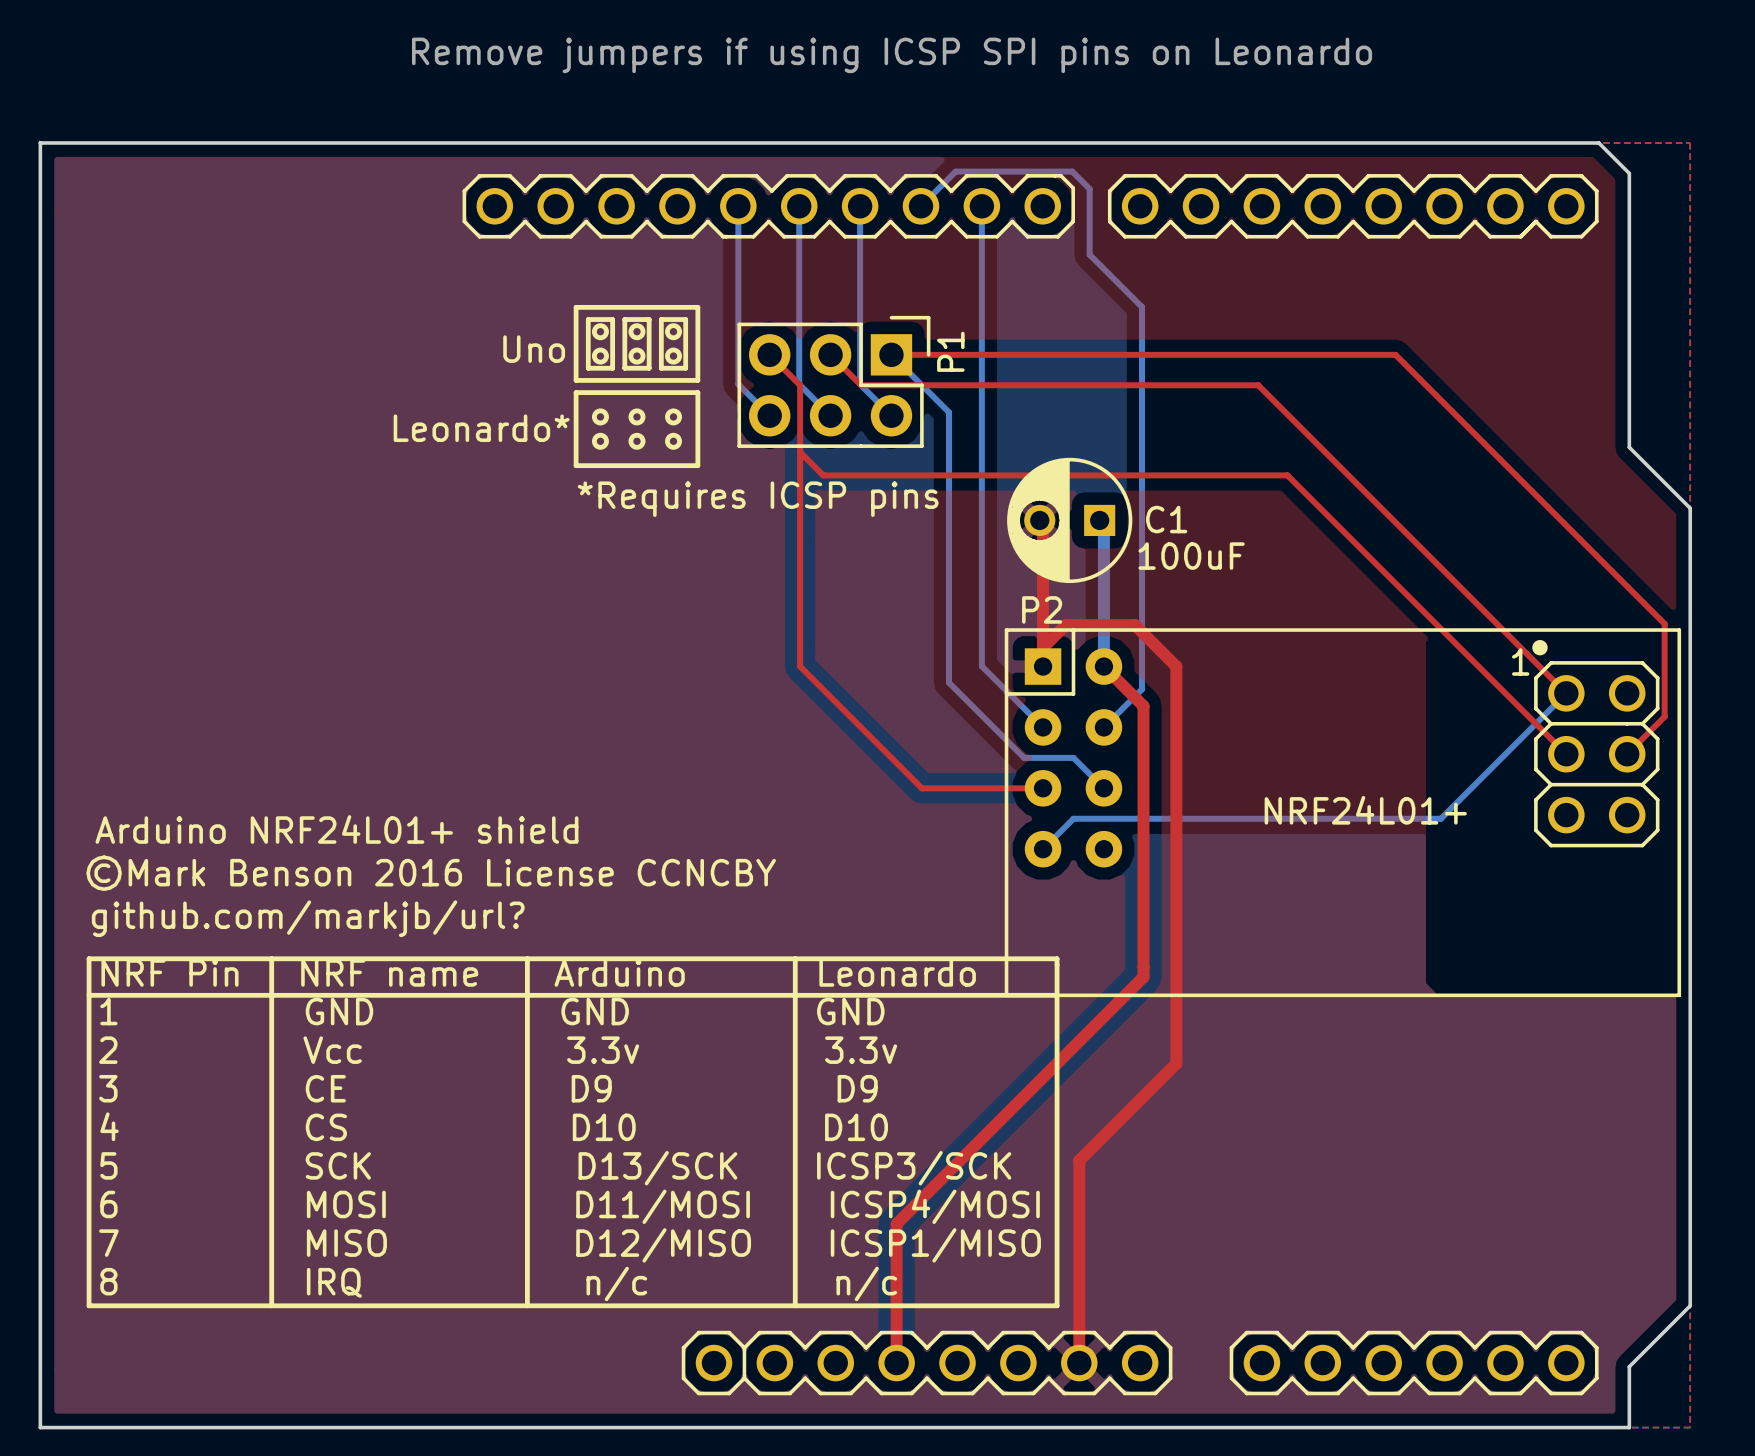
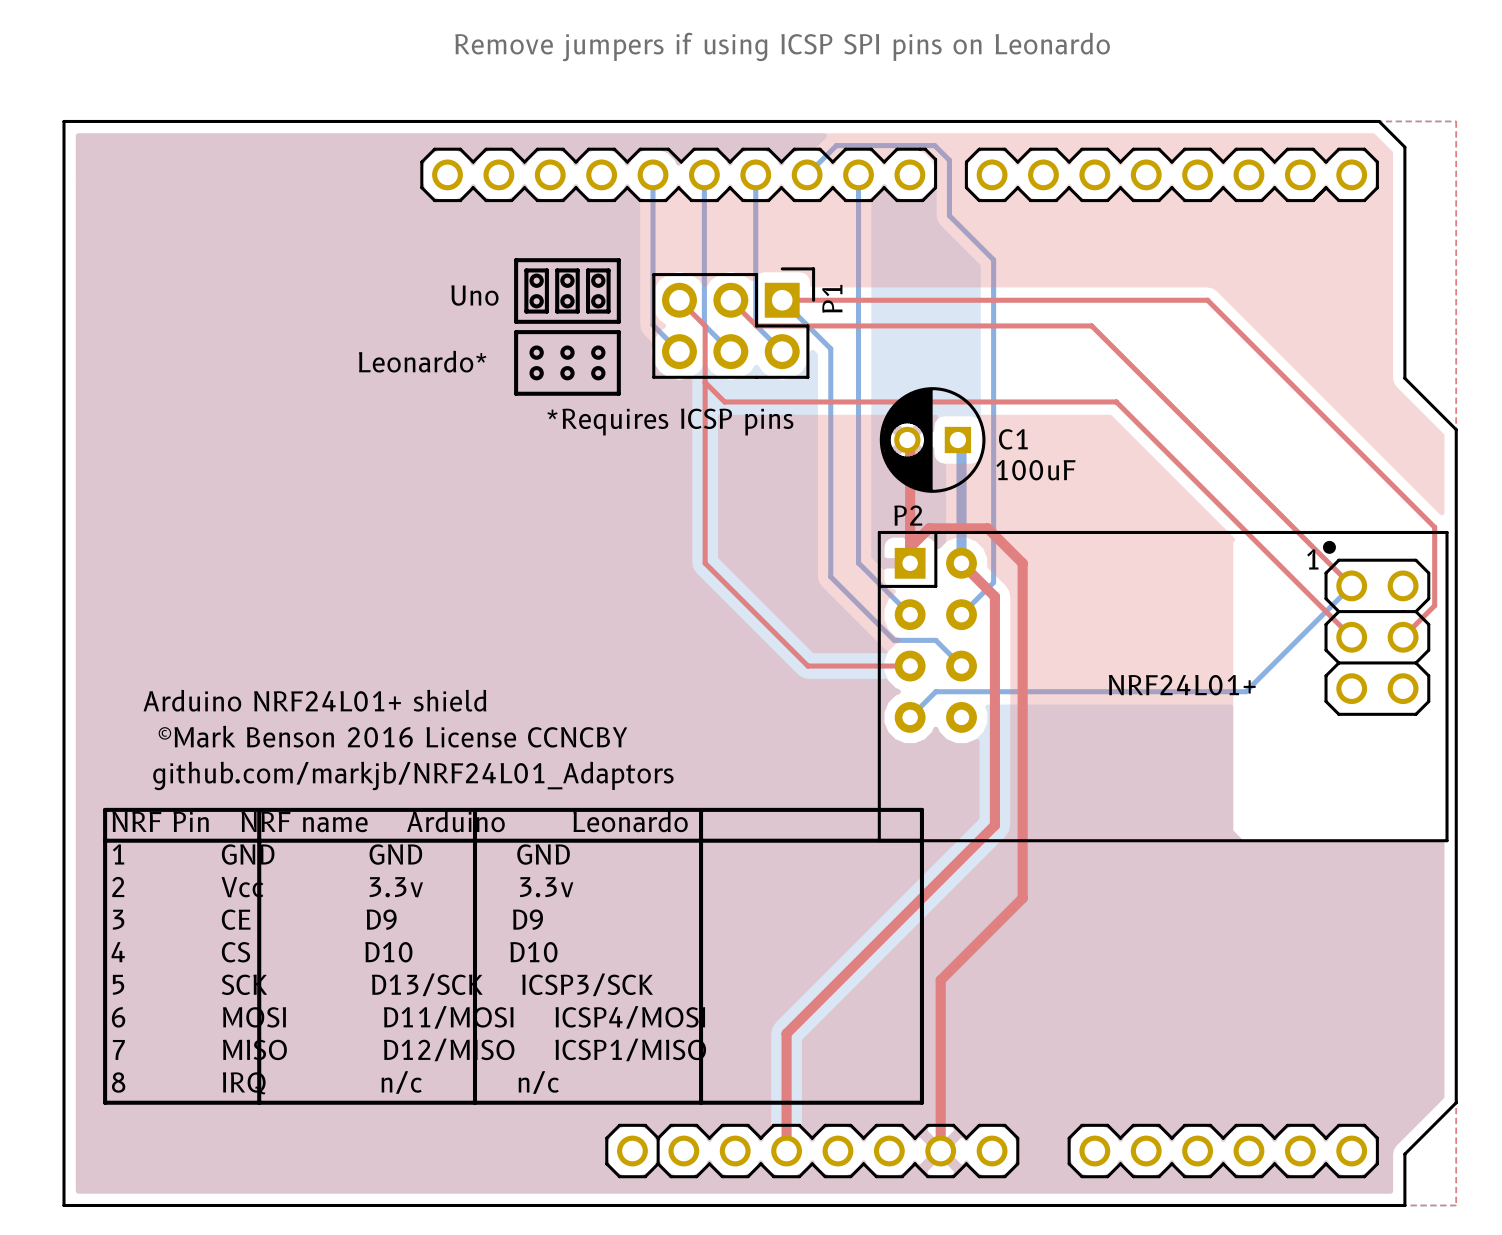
text: github.com/markjb/url? (308, 918) -> github.com/markjb/NRF24L01_Adaptors (413, 775)

